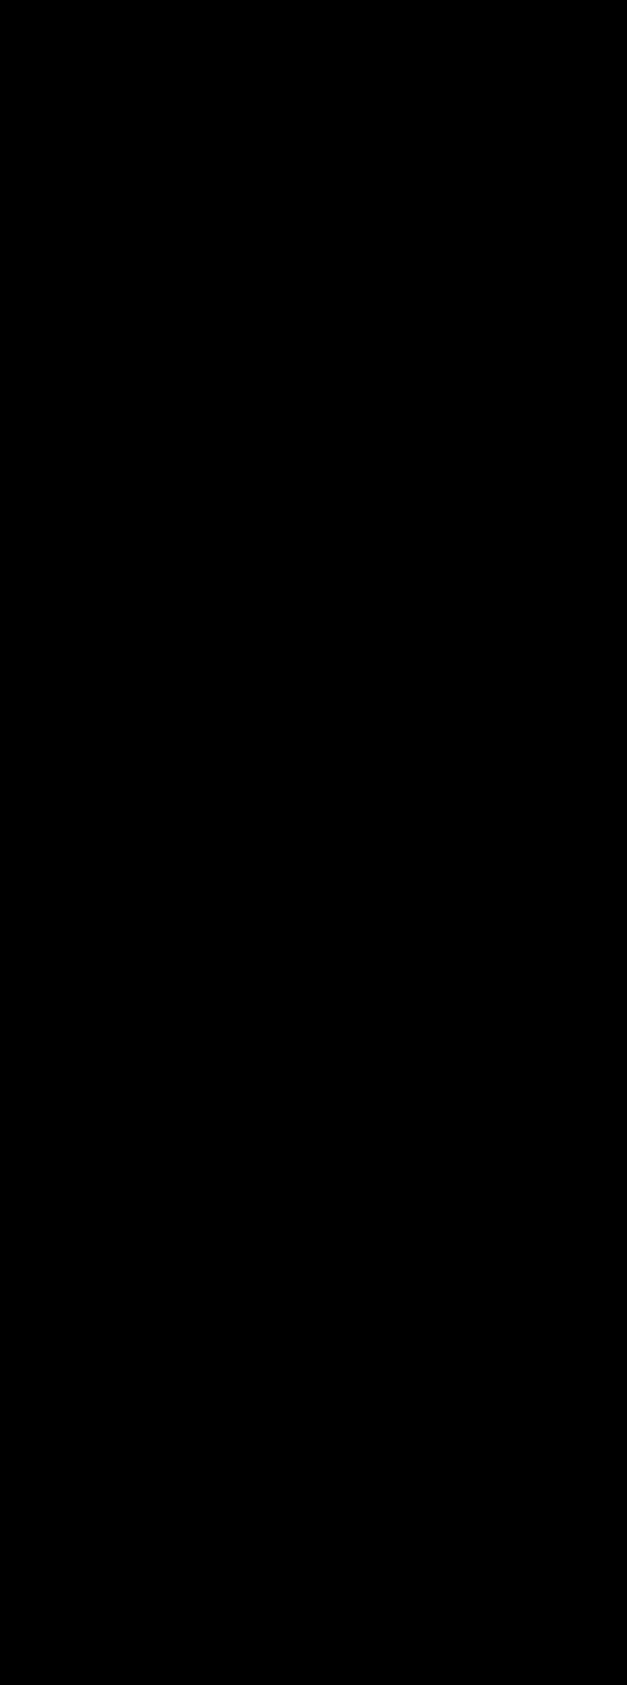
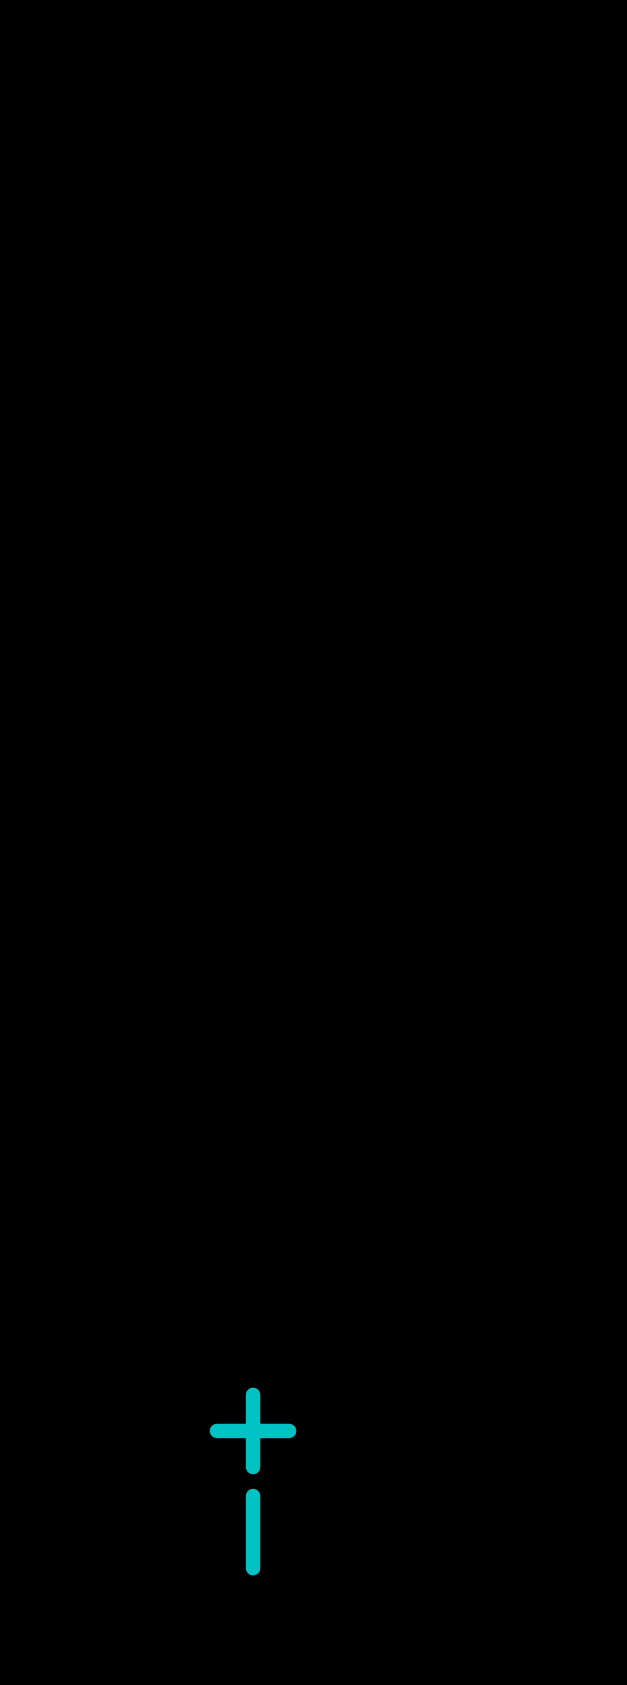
line: none -> (253, 1394) (253, 1467)
line: none -> (289, 1430) (216, 1430)
line: none -> (253, 1495) (253, 1568)

